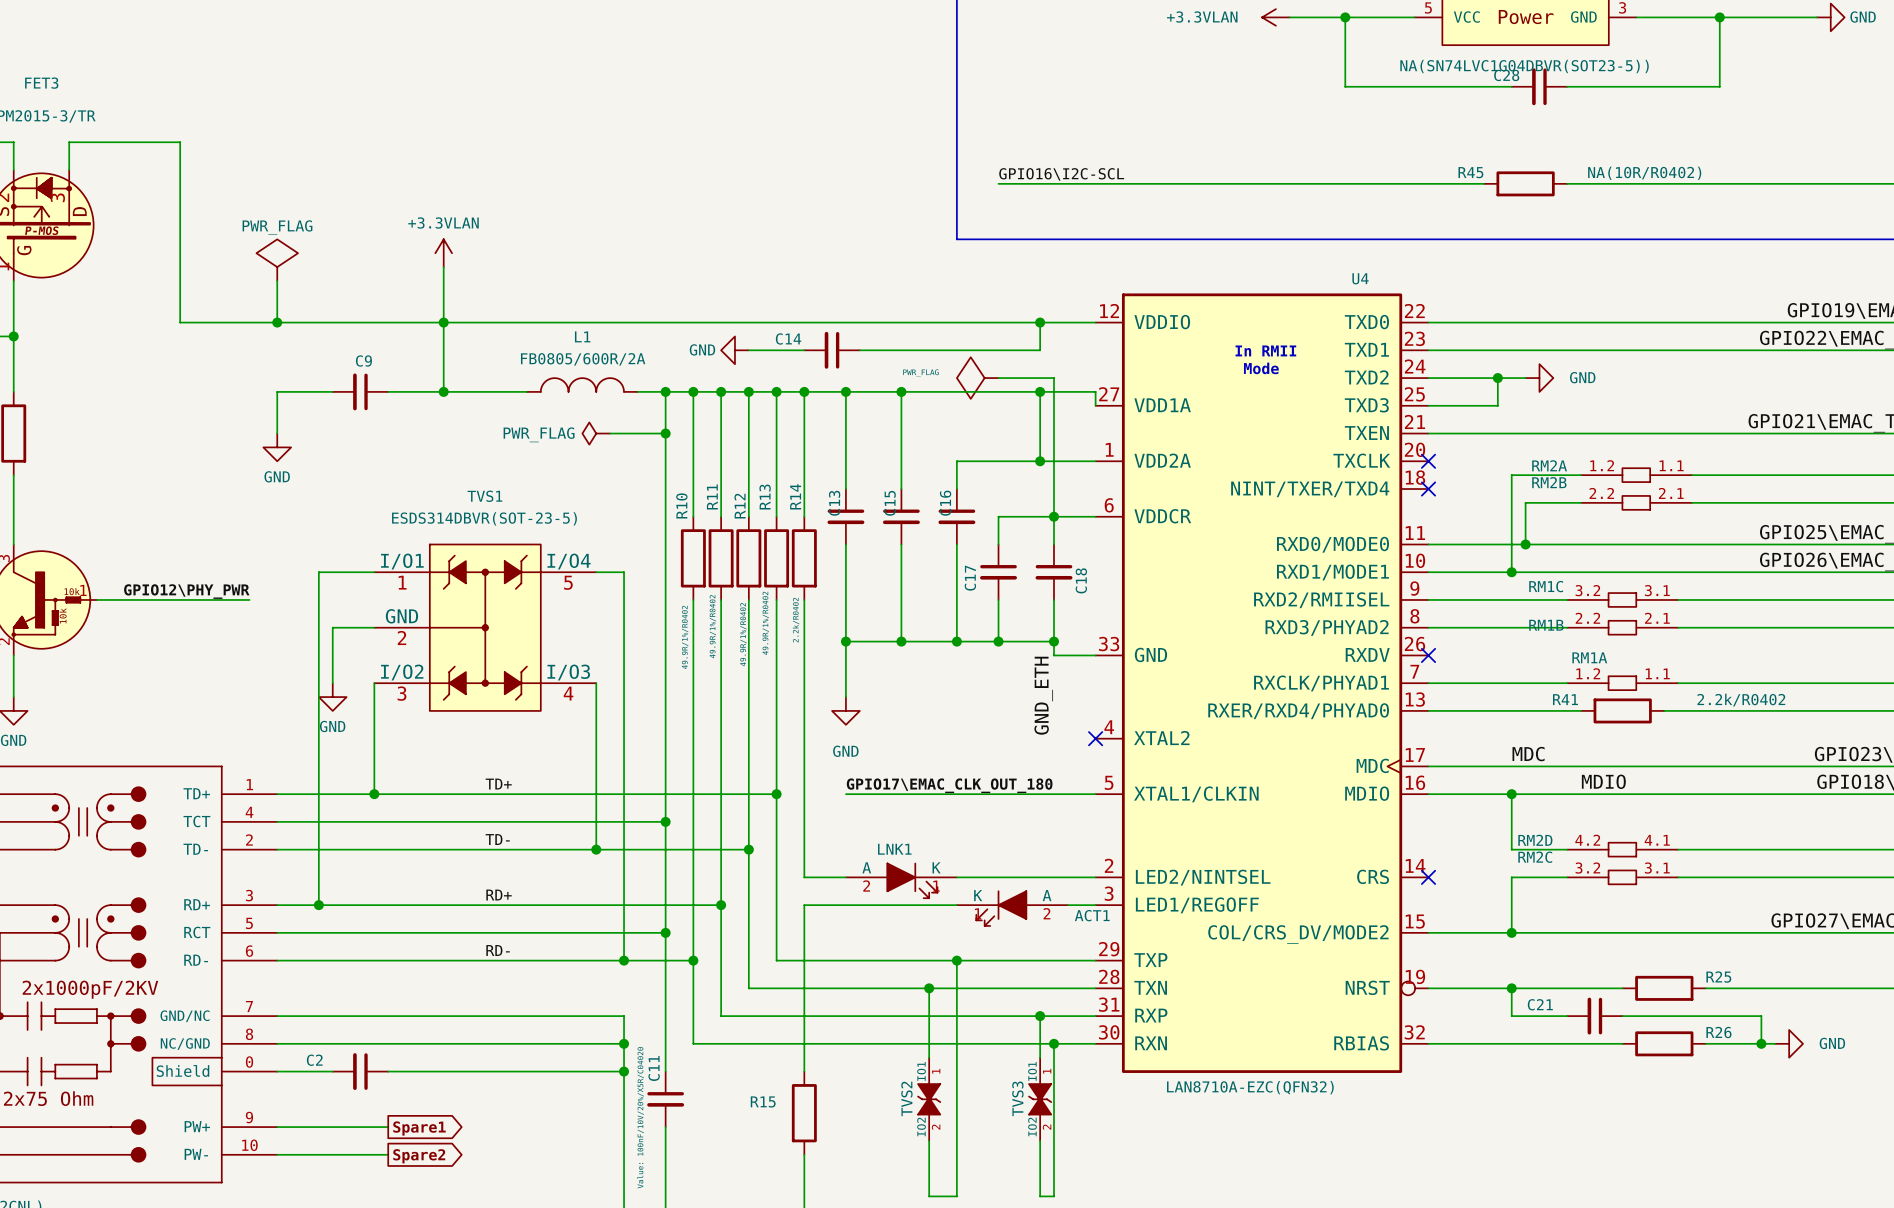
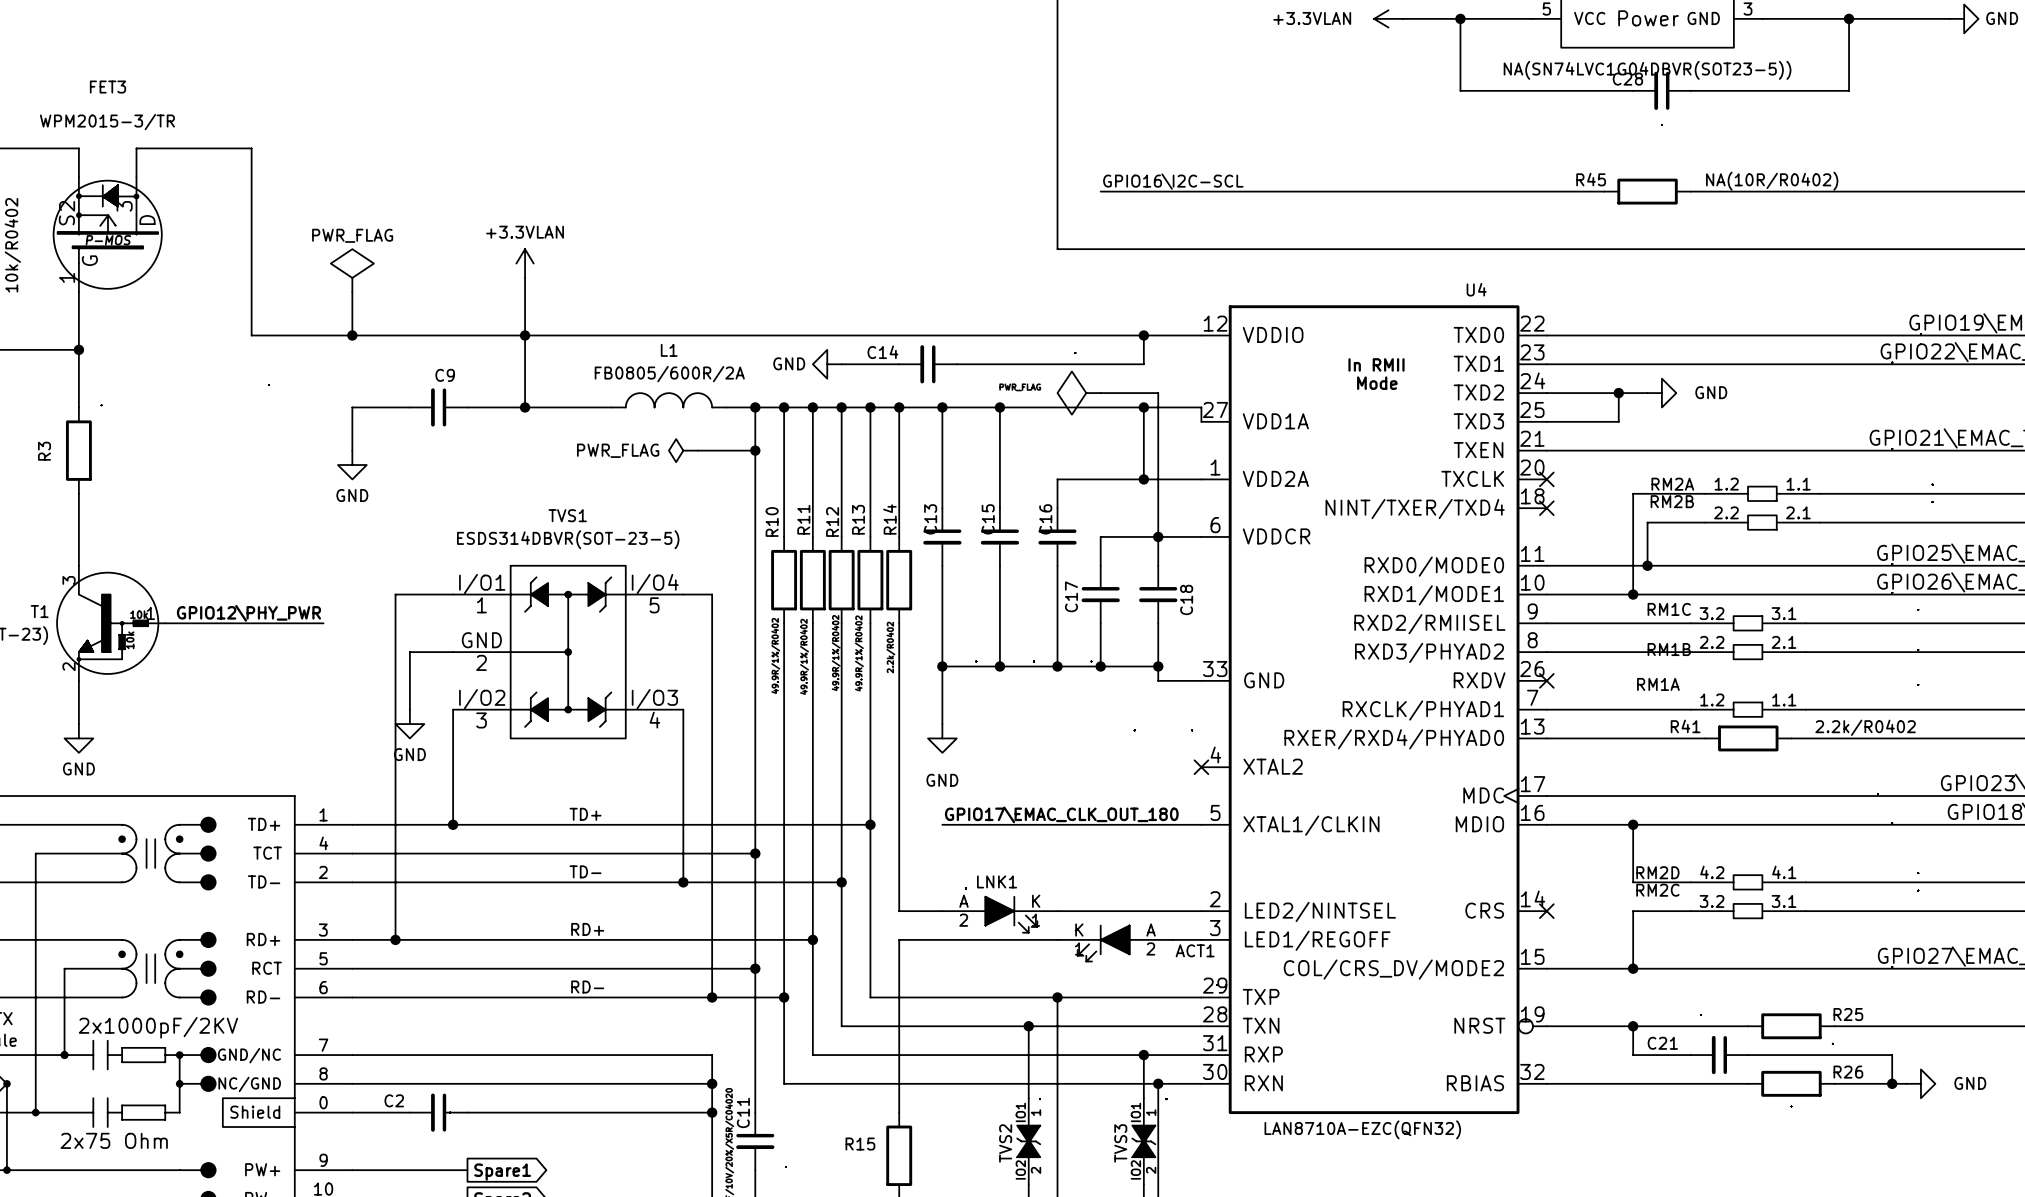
RM1A name position: RM1A (1589, 657) -> RM1A (1658, 684)
label: GND_ETH (1043, 695) -> none
label: MDC (1528, 754) -> none
label: MDIO (1603, 781) -> none

